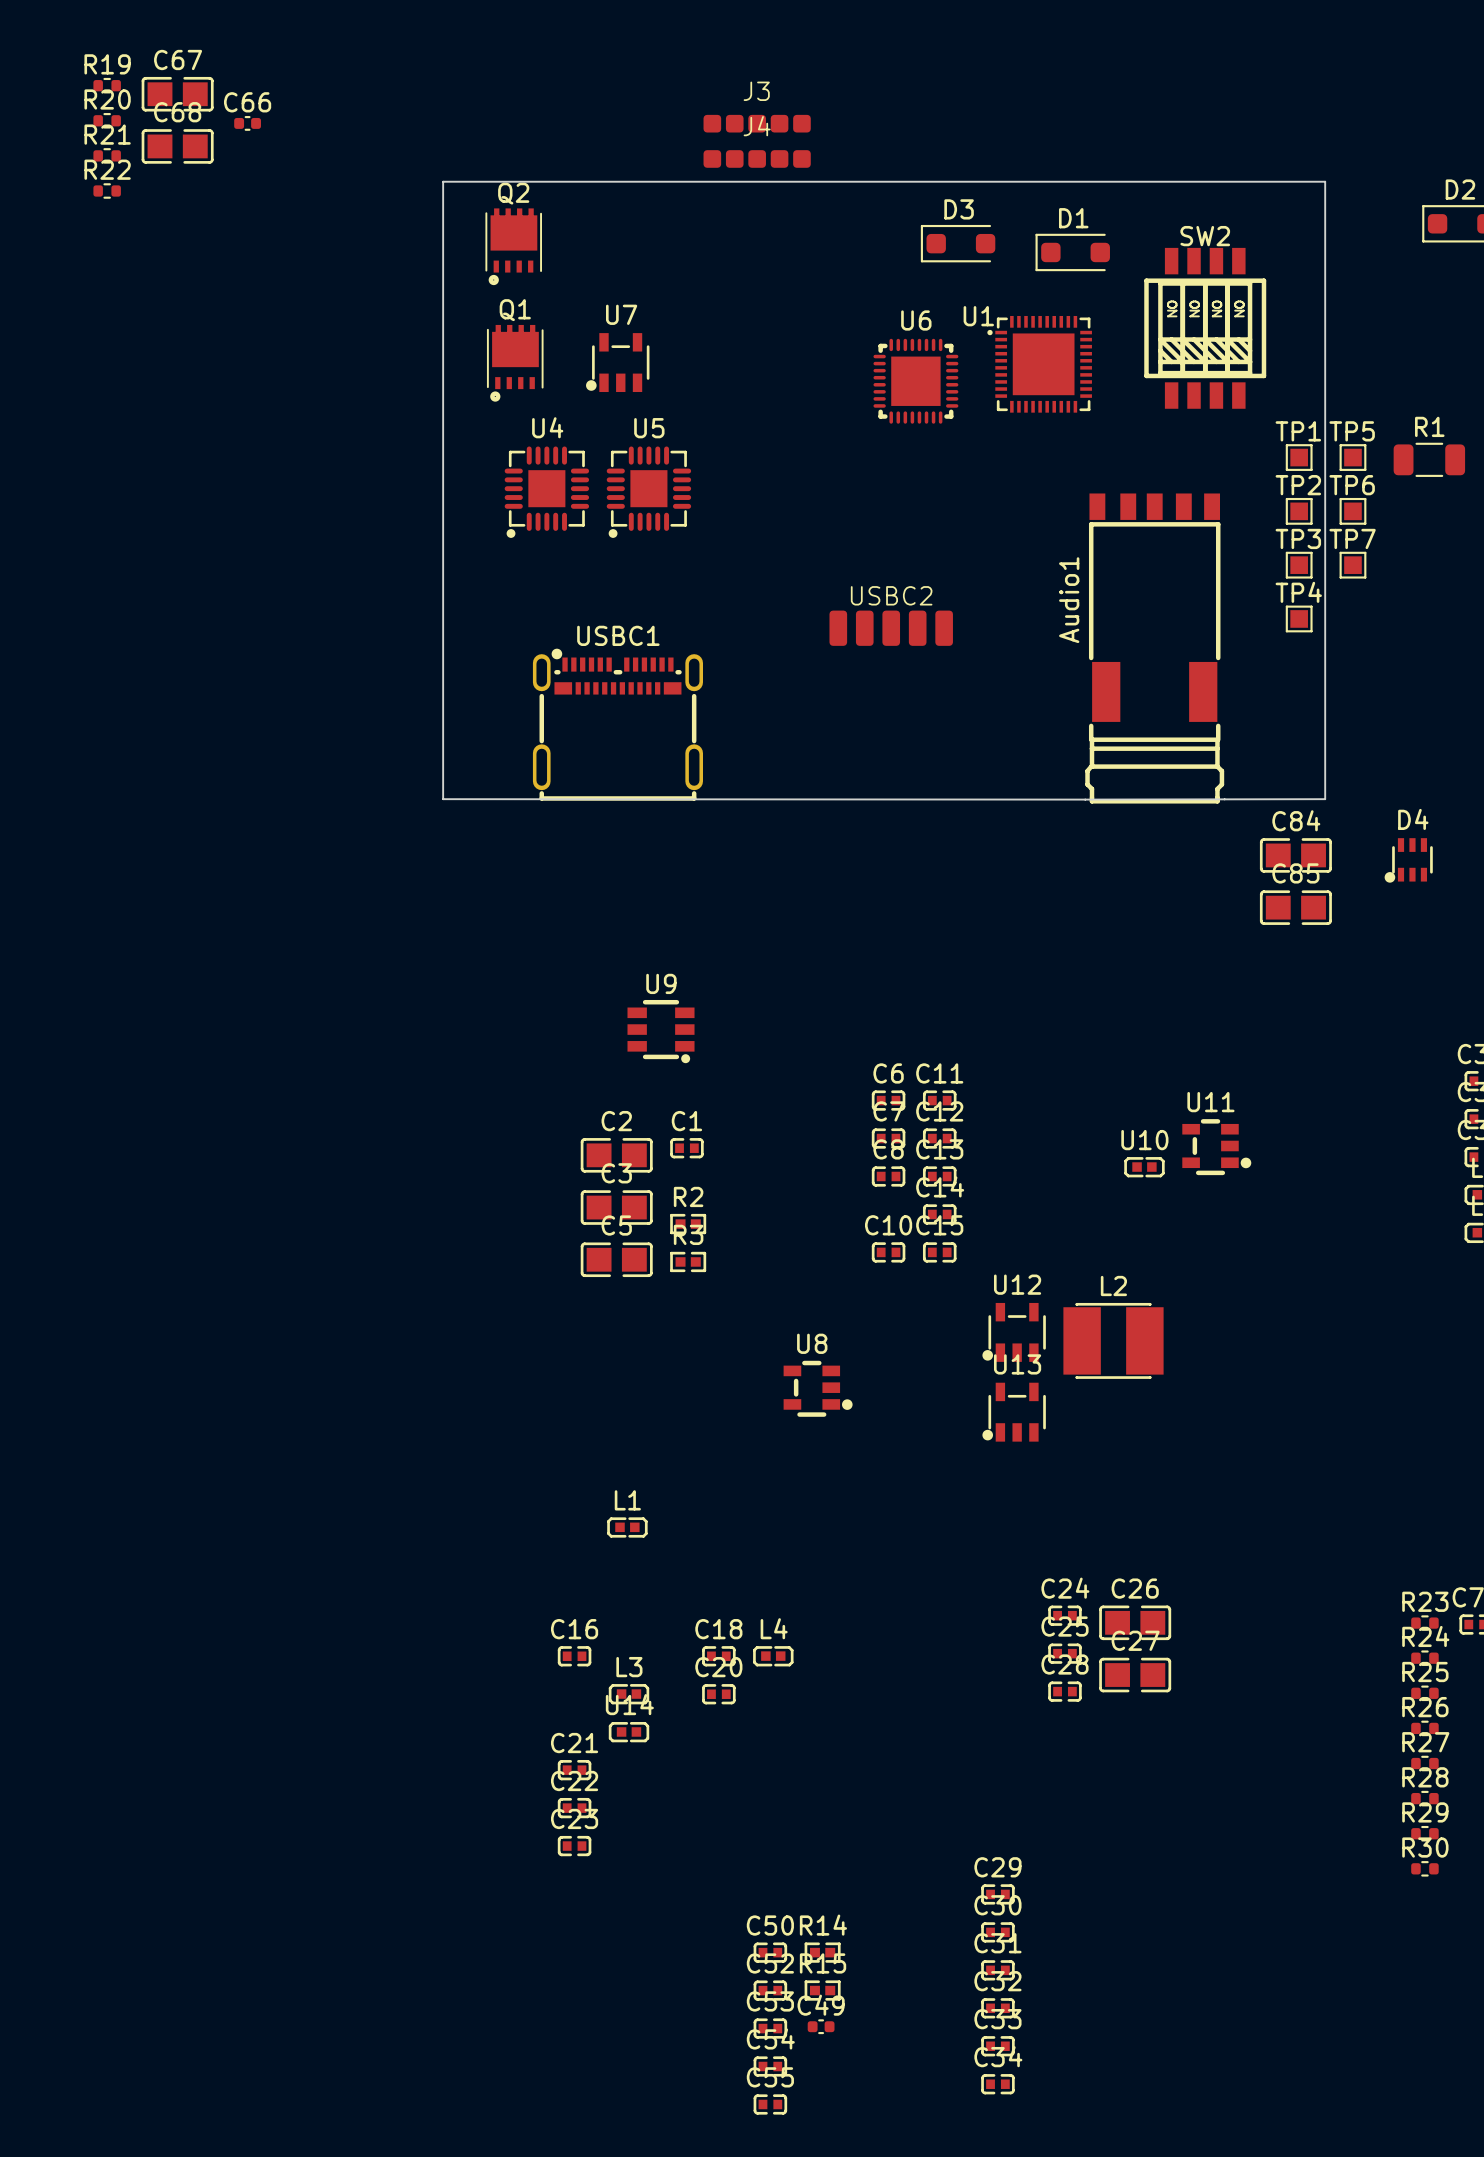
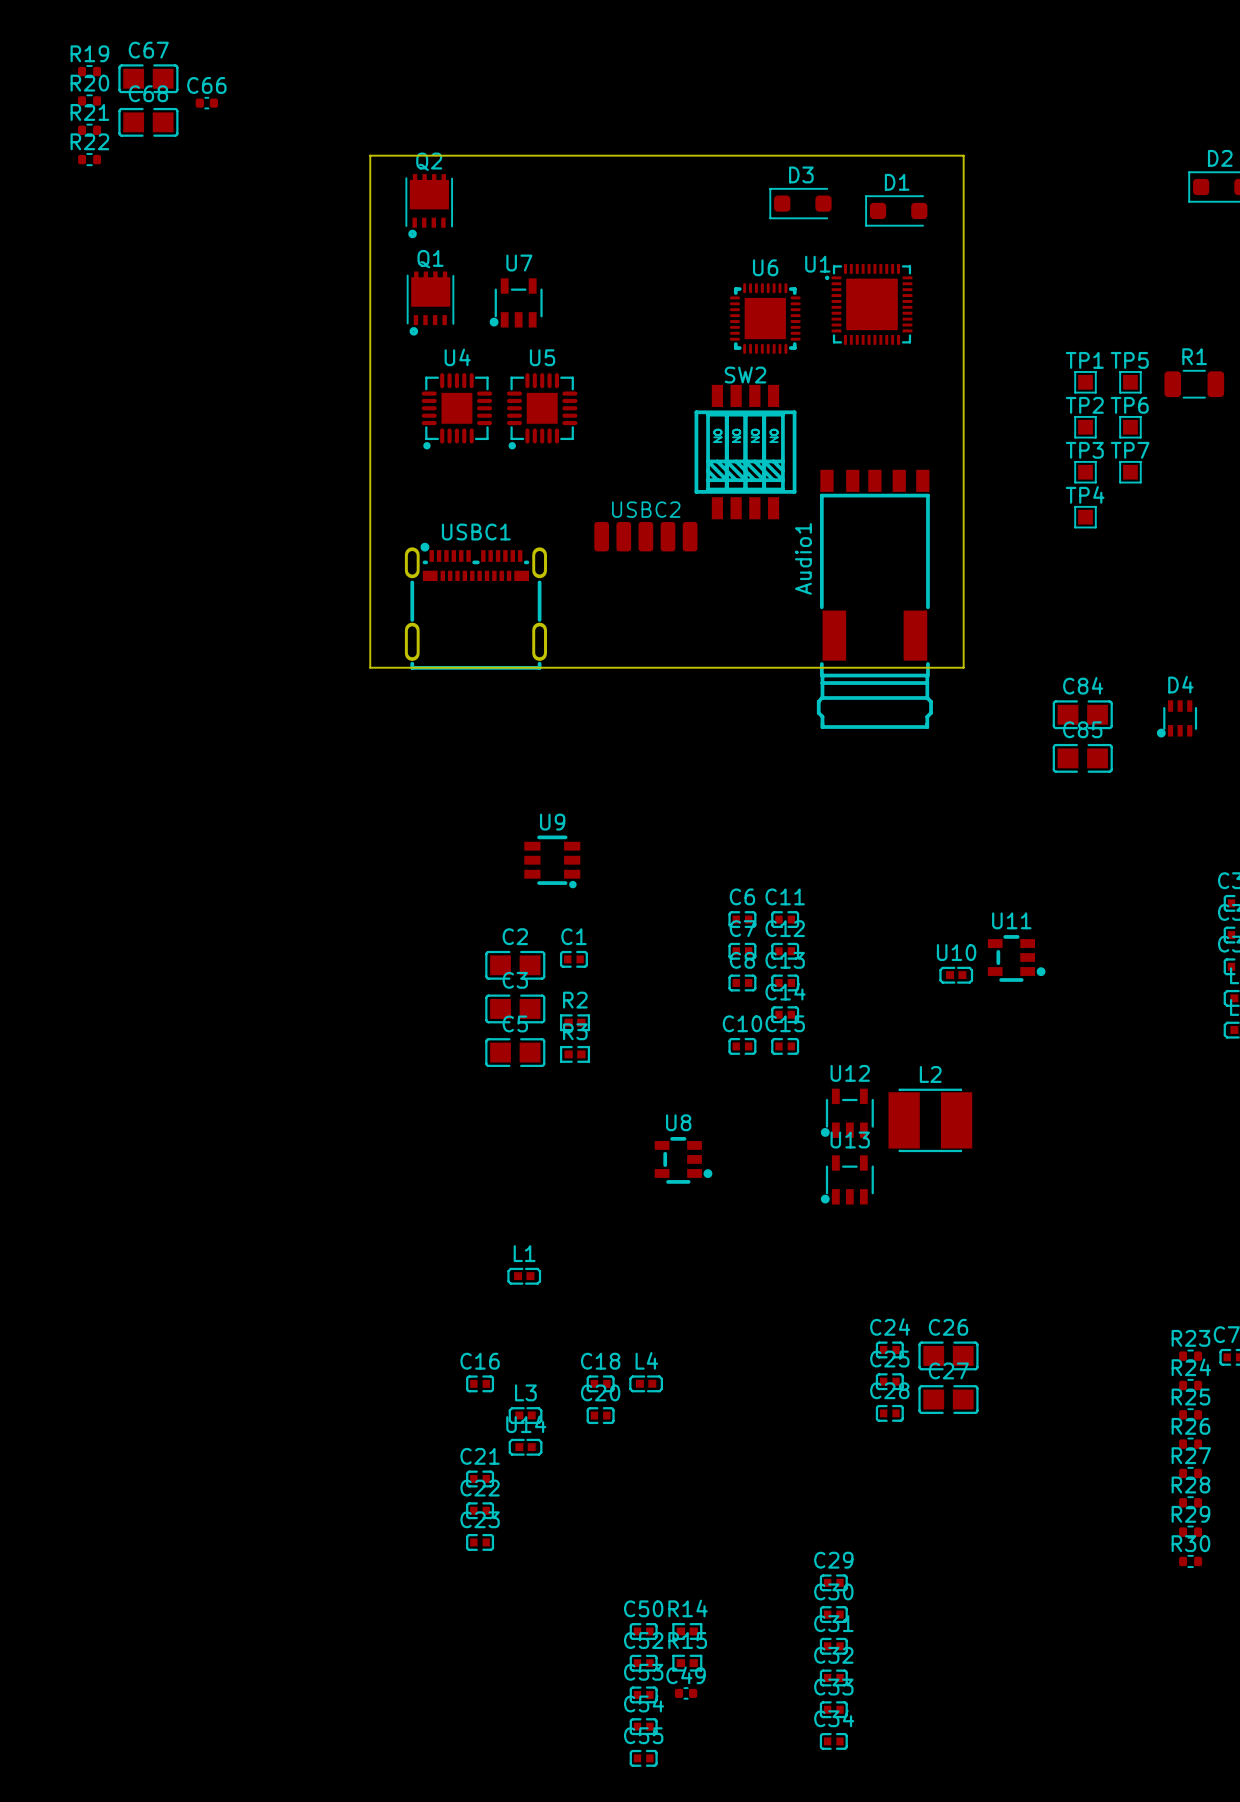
J3: (757, 123) -> none
J4: (757, 158) -> none
board edge: (443, 186) (443, 181) (1325, 181) (1325, 799) (443, 799) -> (370, 155) (963, 155) (963, 667) (370, 667)
SW2 position: (1205, 328) -> (745, 452)
USBC2 position: (891, 628) -> (645, 536)
Audio1 position: (1154, 648) -> (874, 599)
USBC1 position: (617, 724) -> (475, 606)

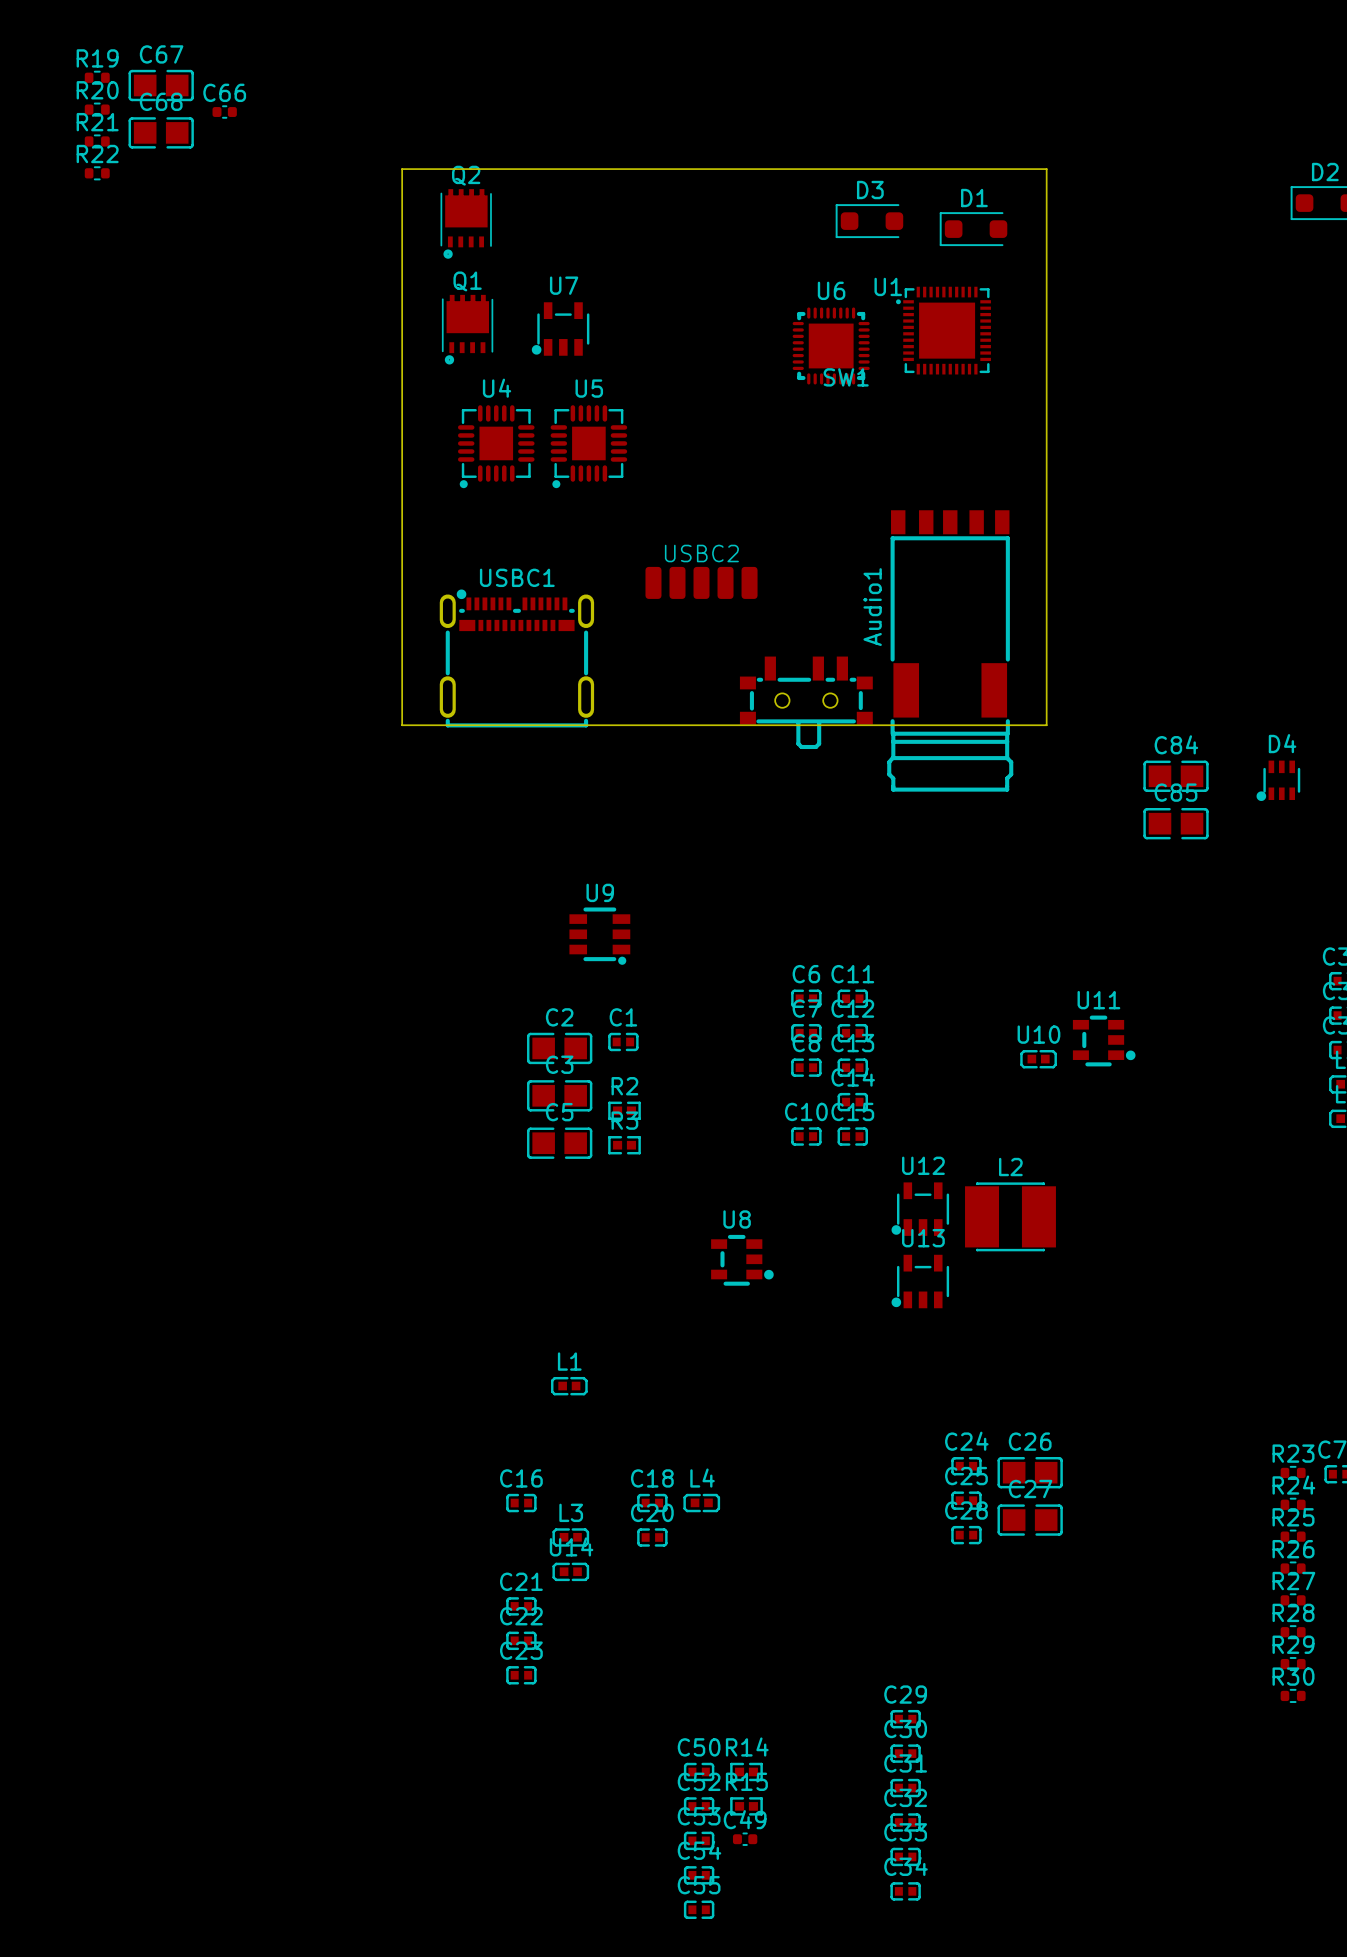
TP1: (1085, 382) -> none
TP5: (1130, 382) -> none
R1: (1194, 384) -> none
TP2: (1085, 427) -> none
TP6: (1130, 427) -> none
SW2: (745, 452) -> none
TP3: (1085, 472) -> none
TP7: (1130, 472) -> none
TP4: (1085, 517) -> none
SW1: none -> (806, 702)

